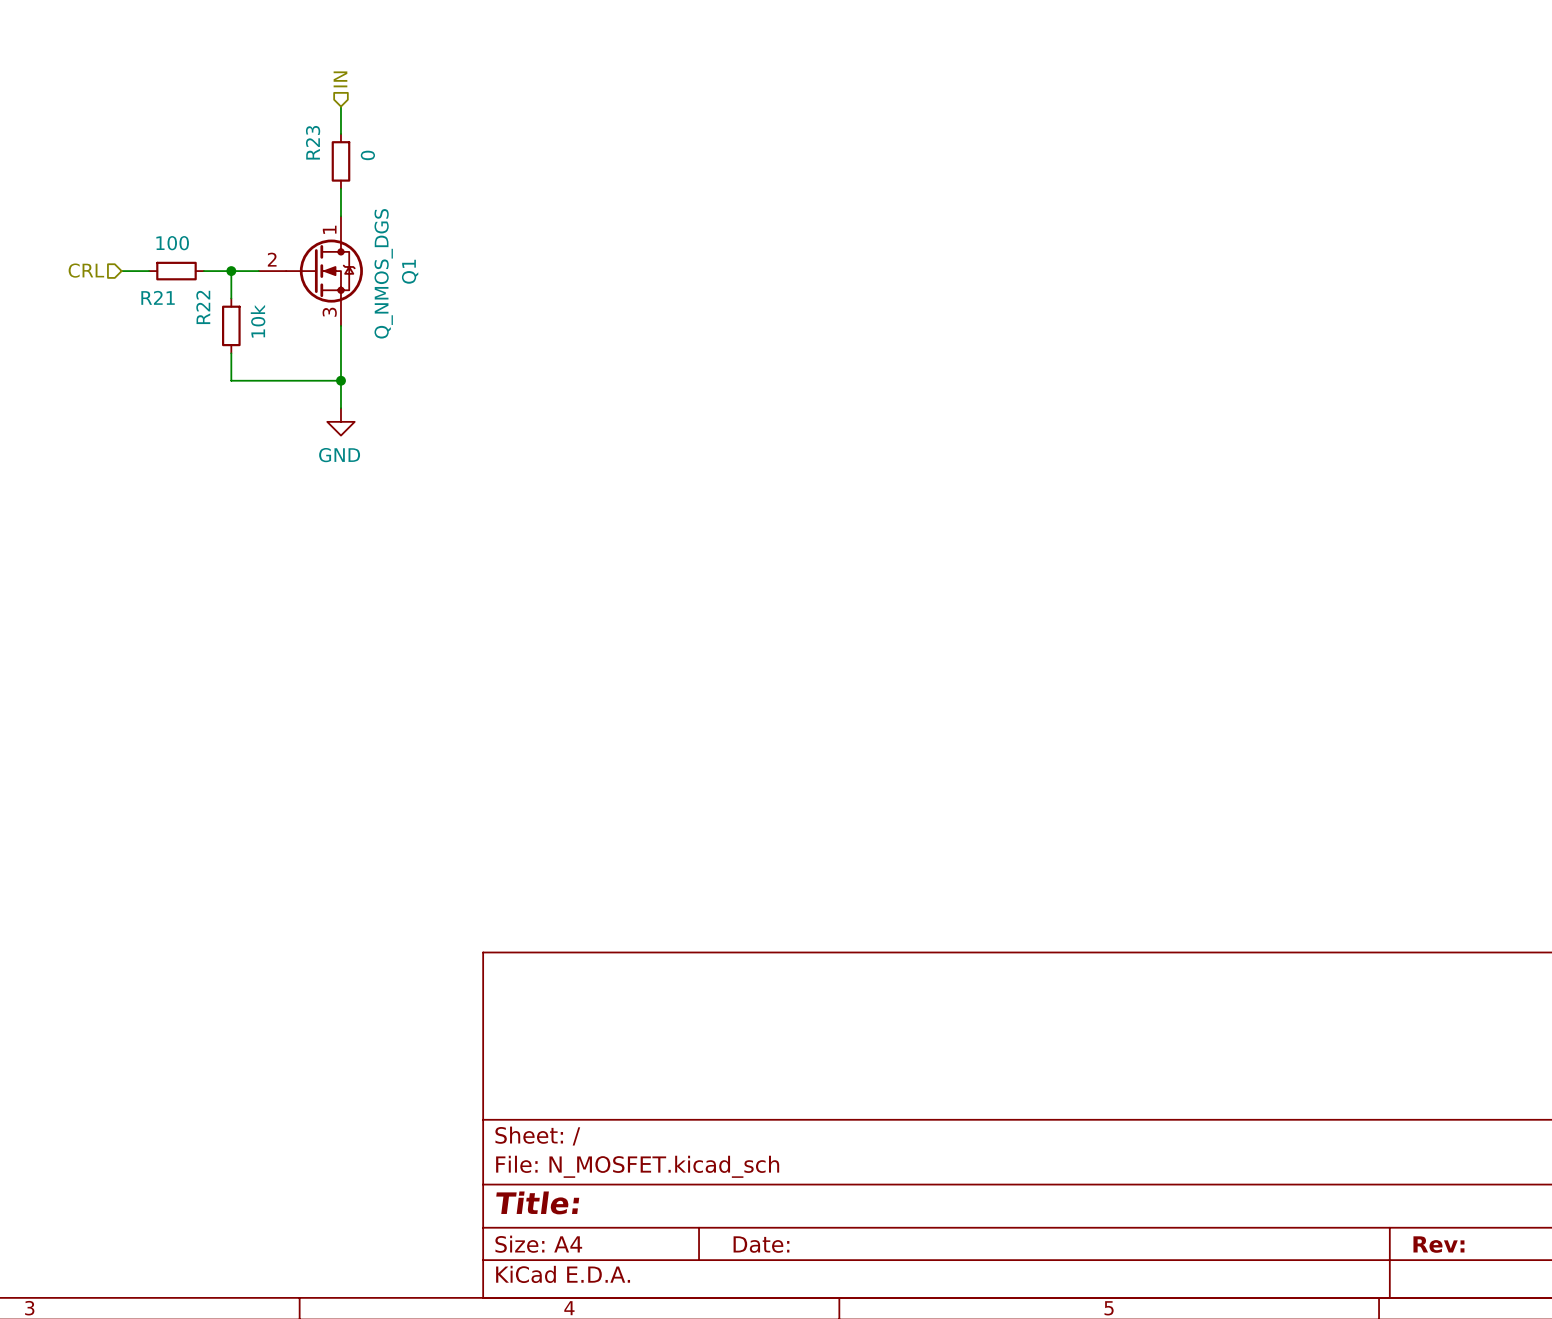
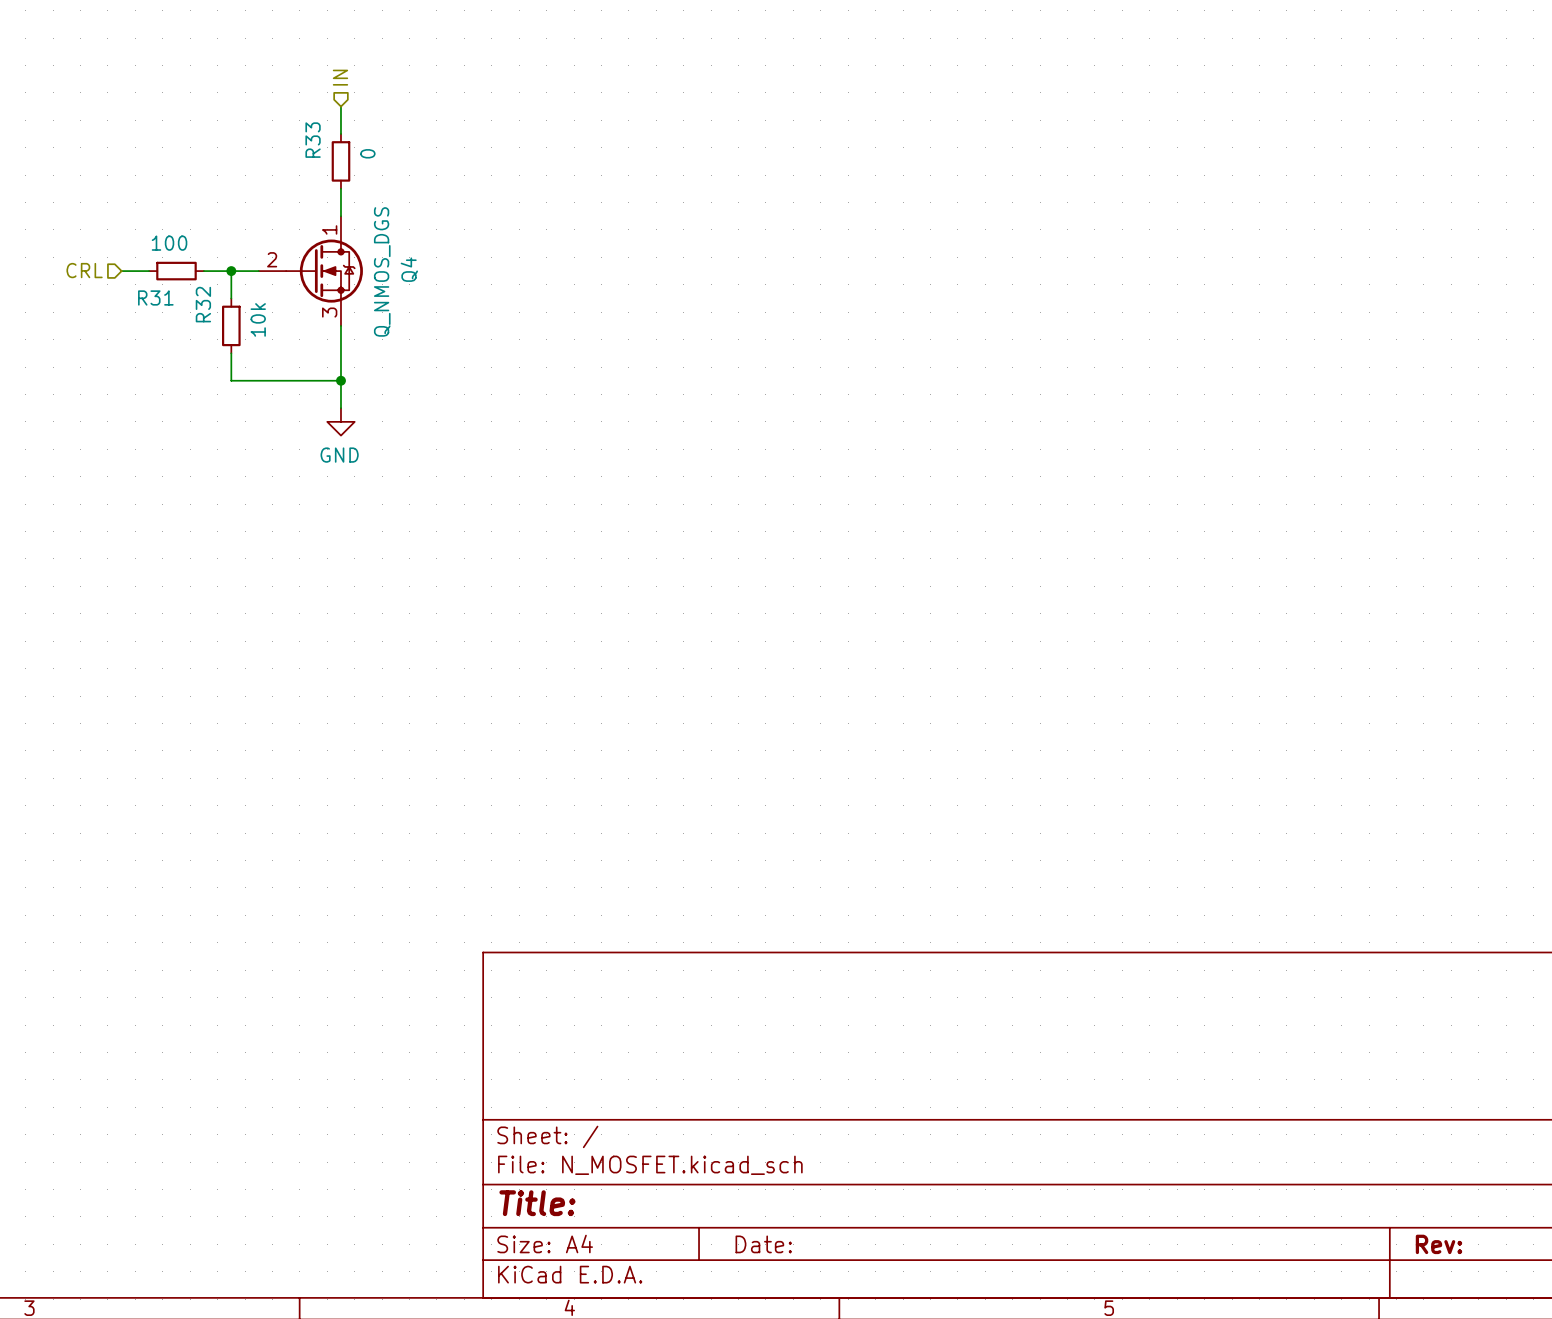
R23 name: R23 (313, 142) -> R33 (313, 140)
Q1 name: Q1 (410, 271) -> Q4 (409, 269)
R21 name: R21 (158, 297) -> R31 (155, 297)
R22 name: R22 (203, 307) -> R32 (203, 304)

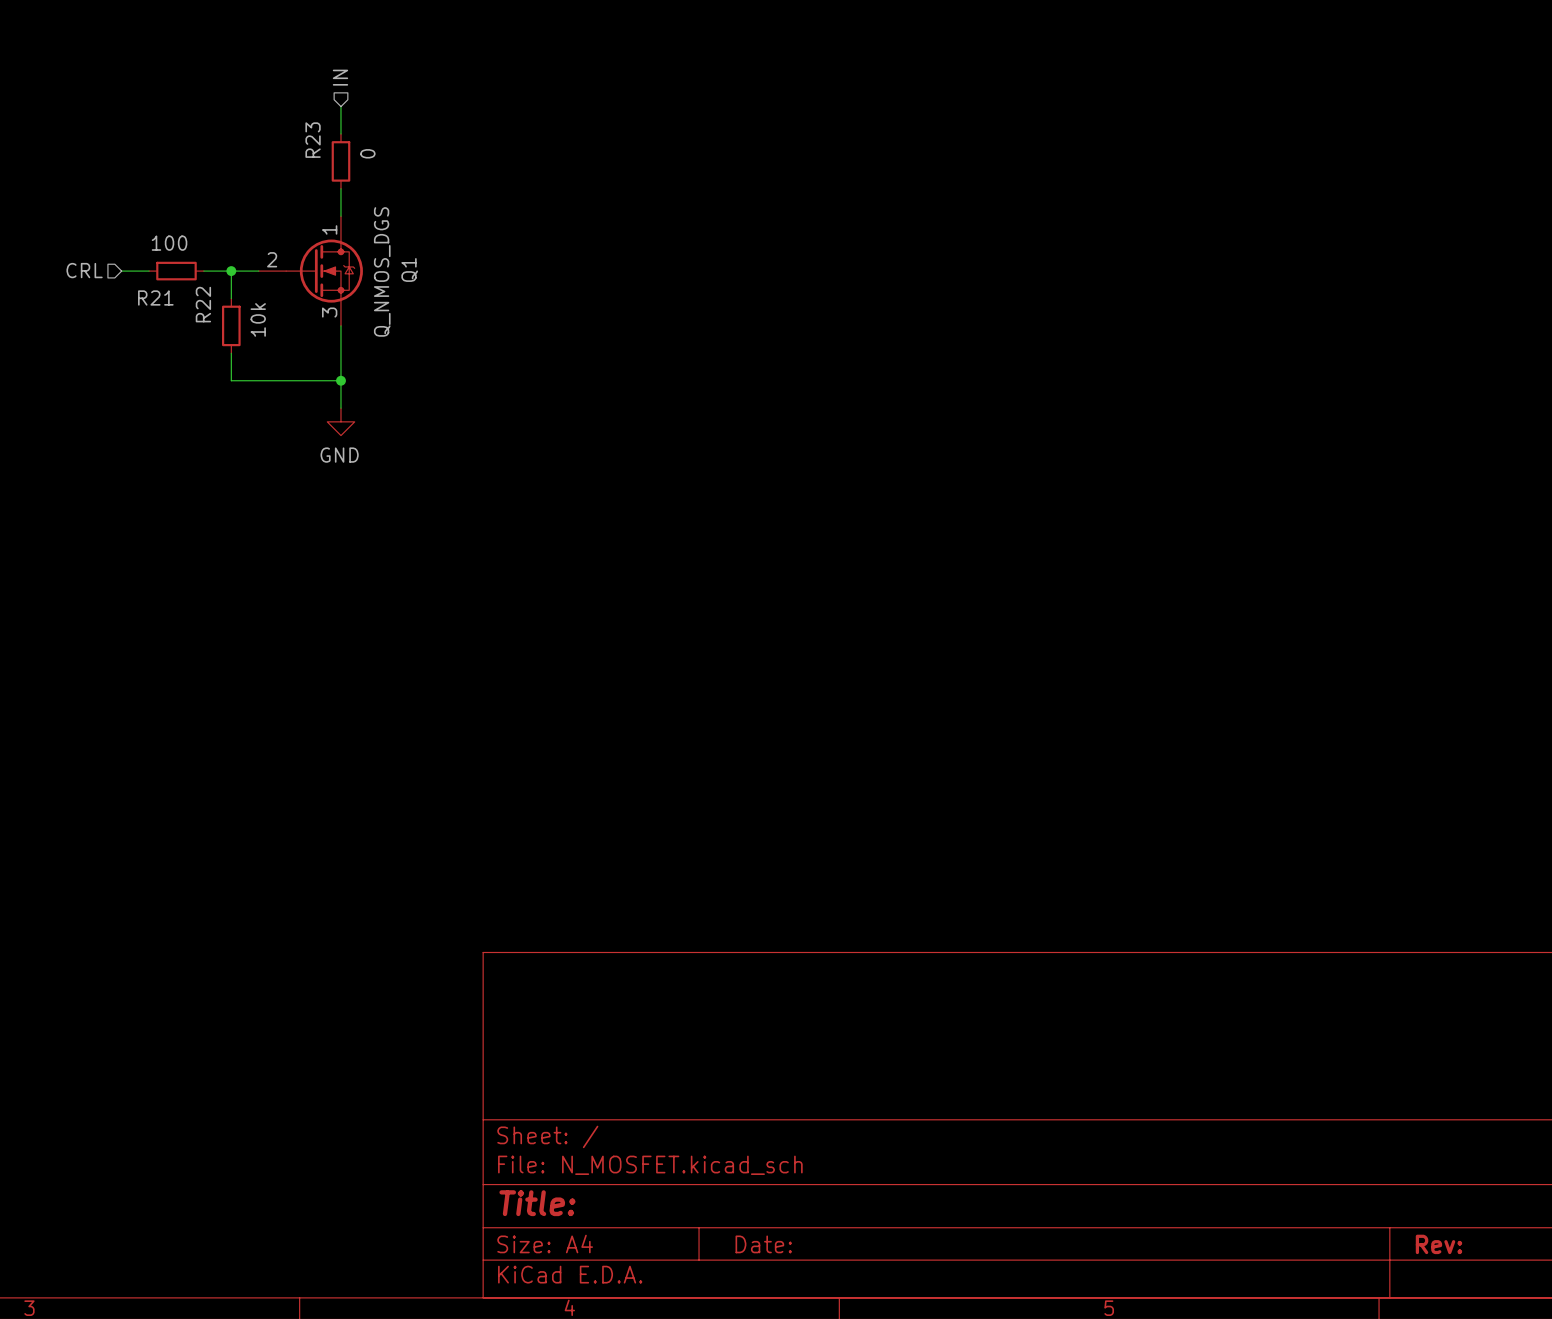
R33 name: R33 (313, 140) -> R23 (313, 140)
Q4 name: Q4 (409, 269) -> Q1 (409, 269)
R31 name: R31 (155, 297) -> R21 (155, 297)
R32 name: R32 (203, 304) -> R22 (203, 304)

